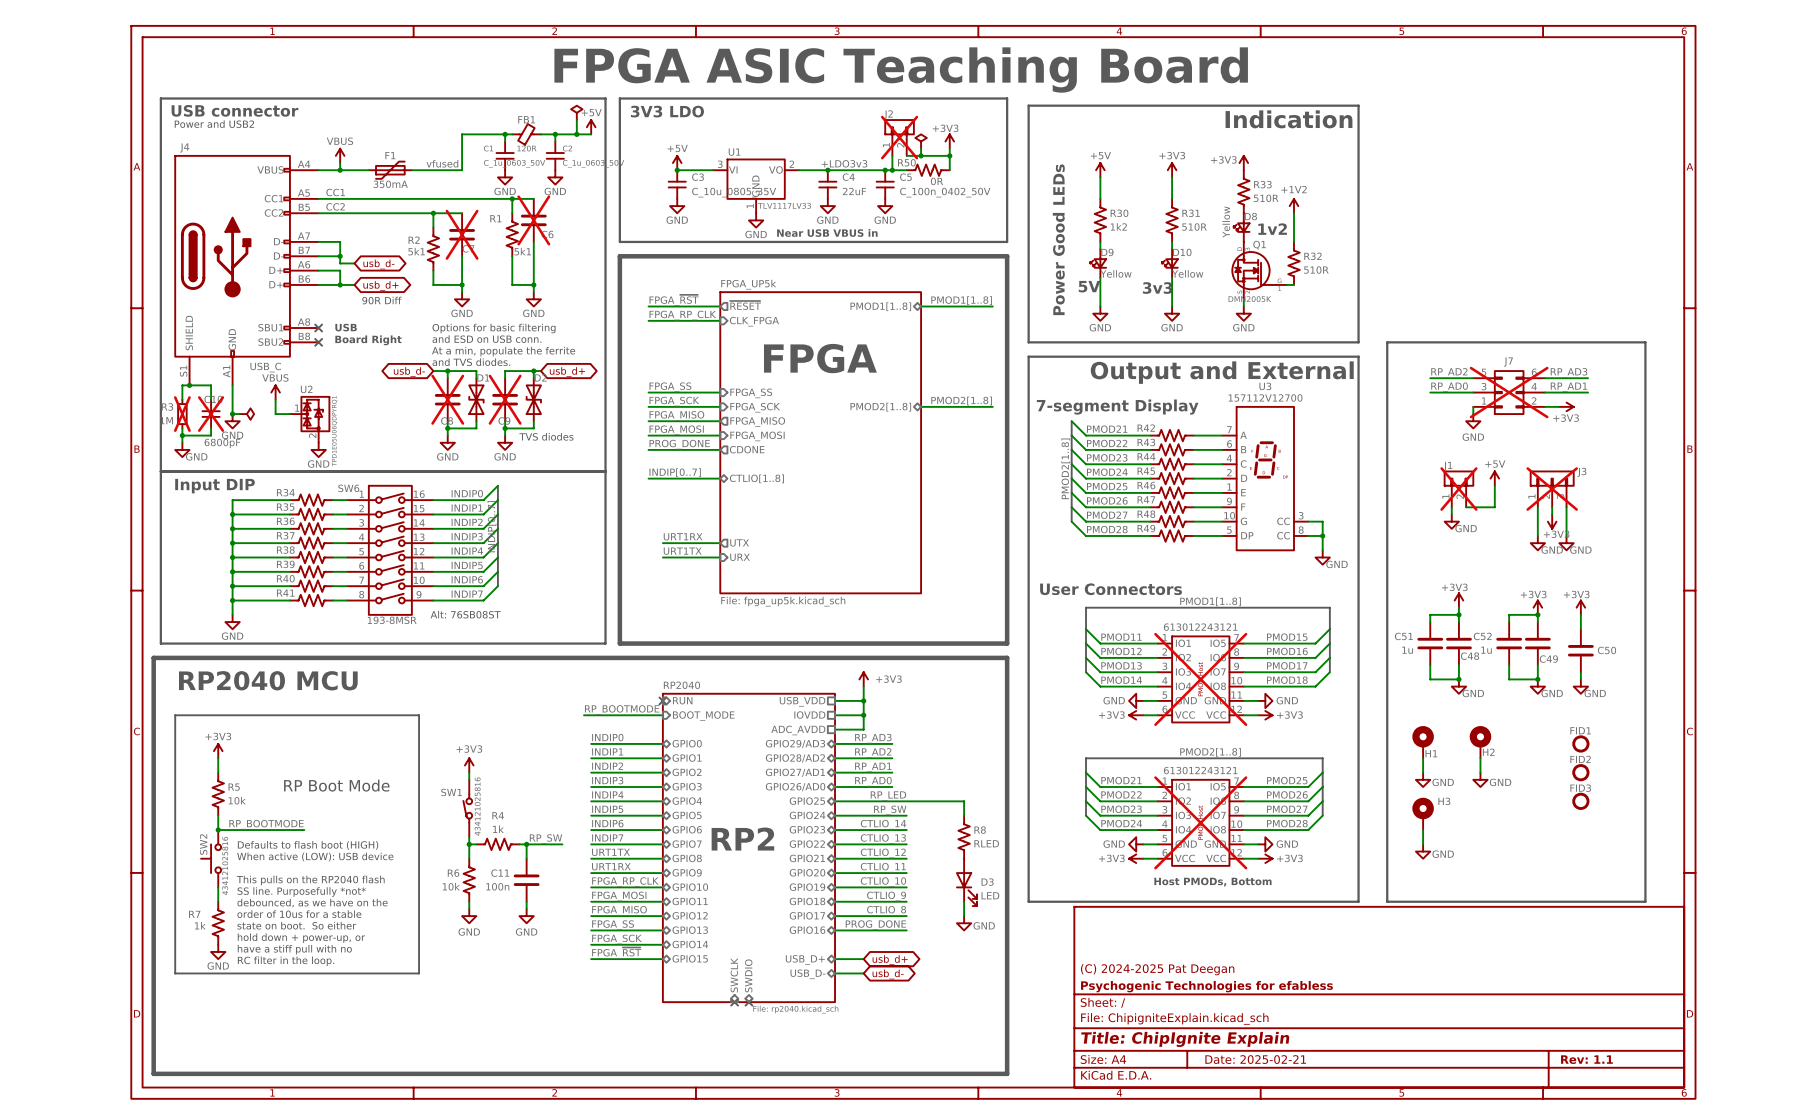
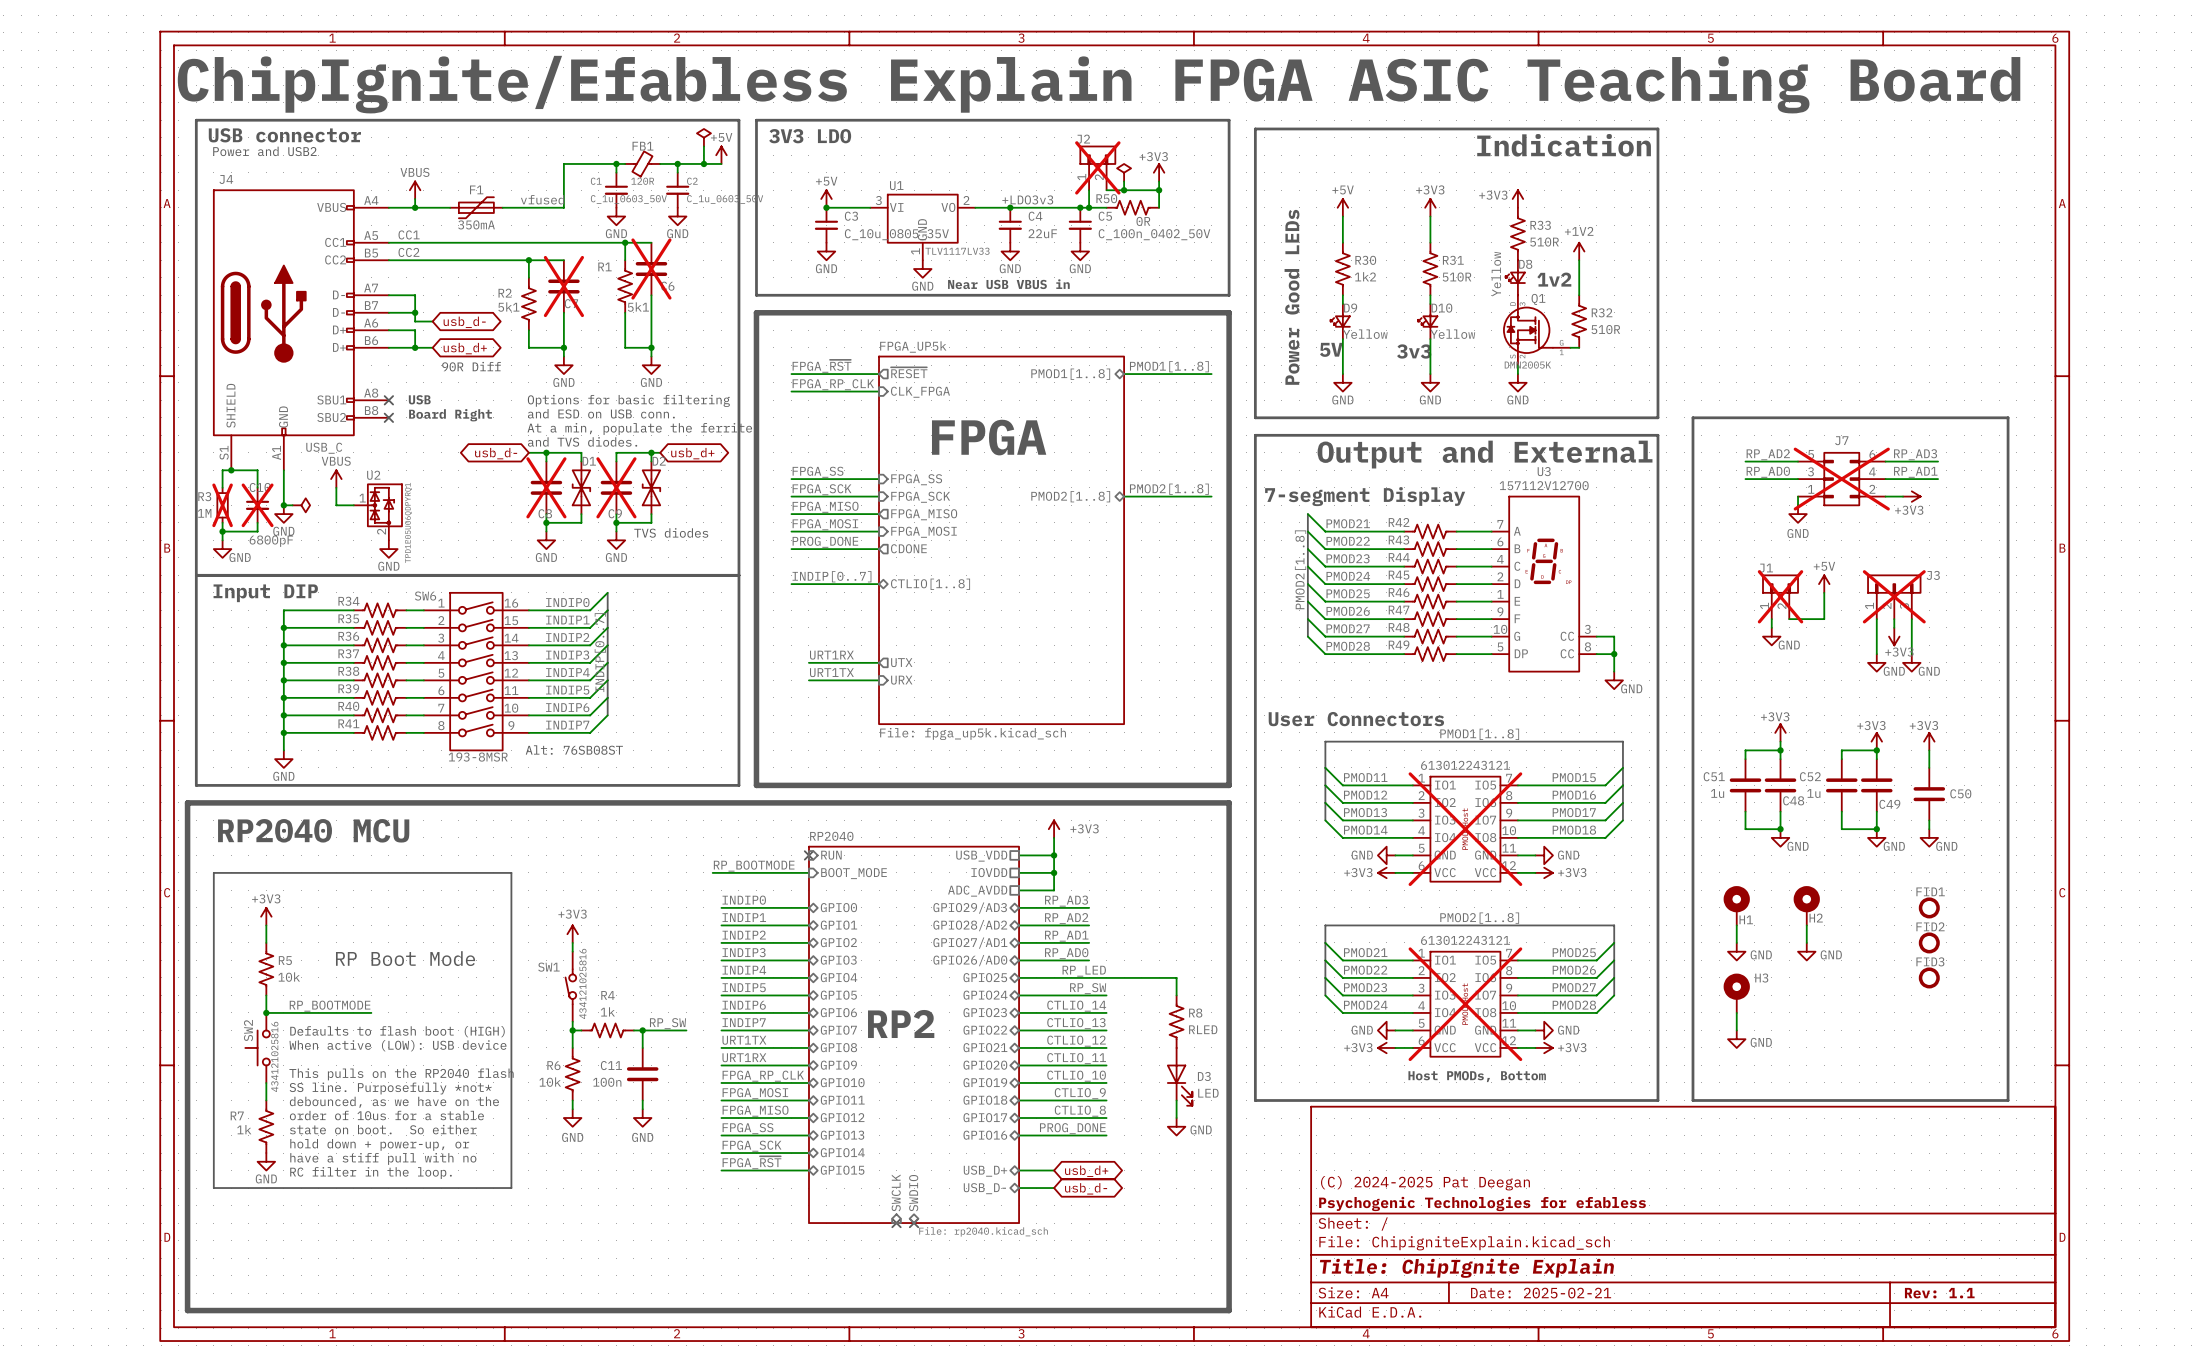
text: FPGA ASIC Teaching Board (901, 70) -> ChipIgnite/Efabless Explain FPGA ASIC Teaching Board (1099, 84)

